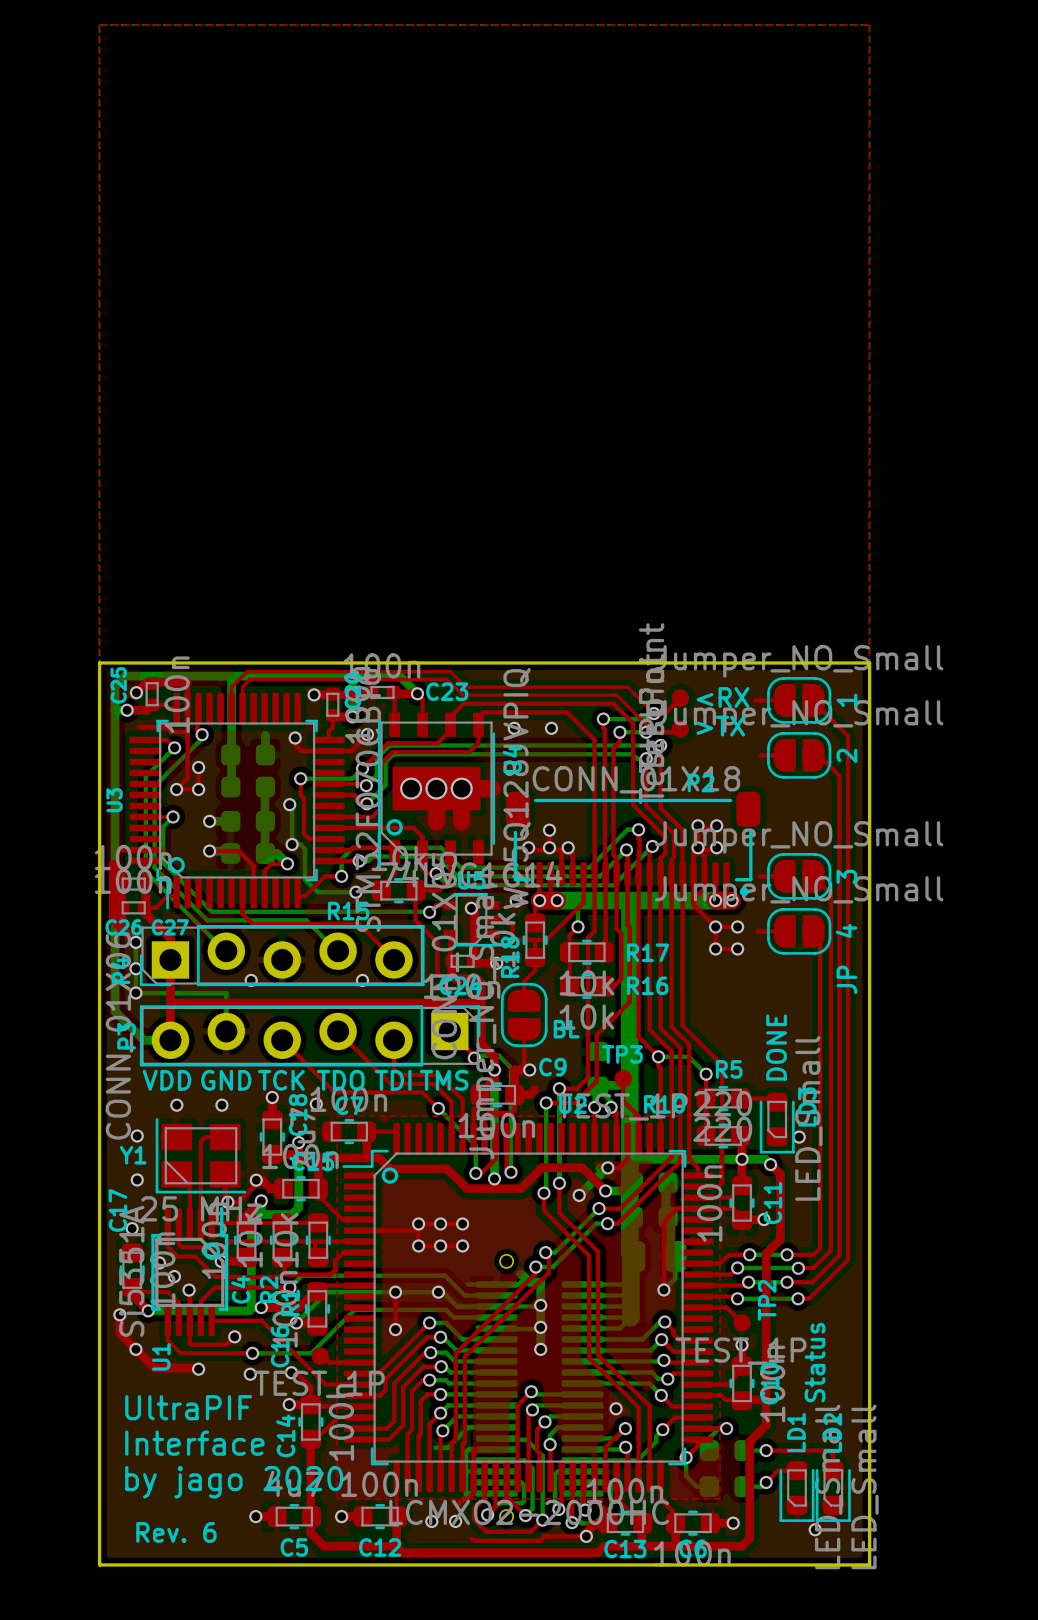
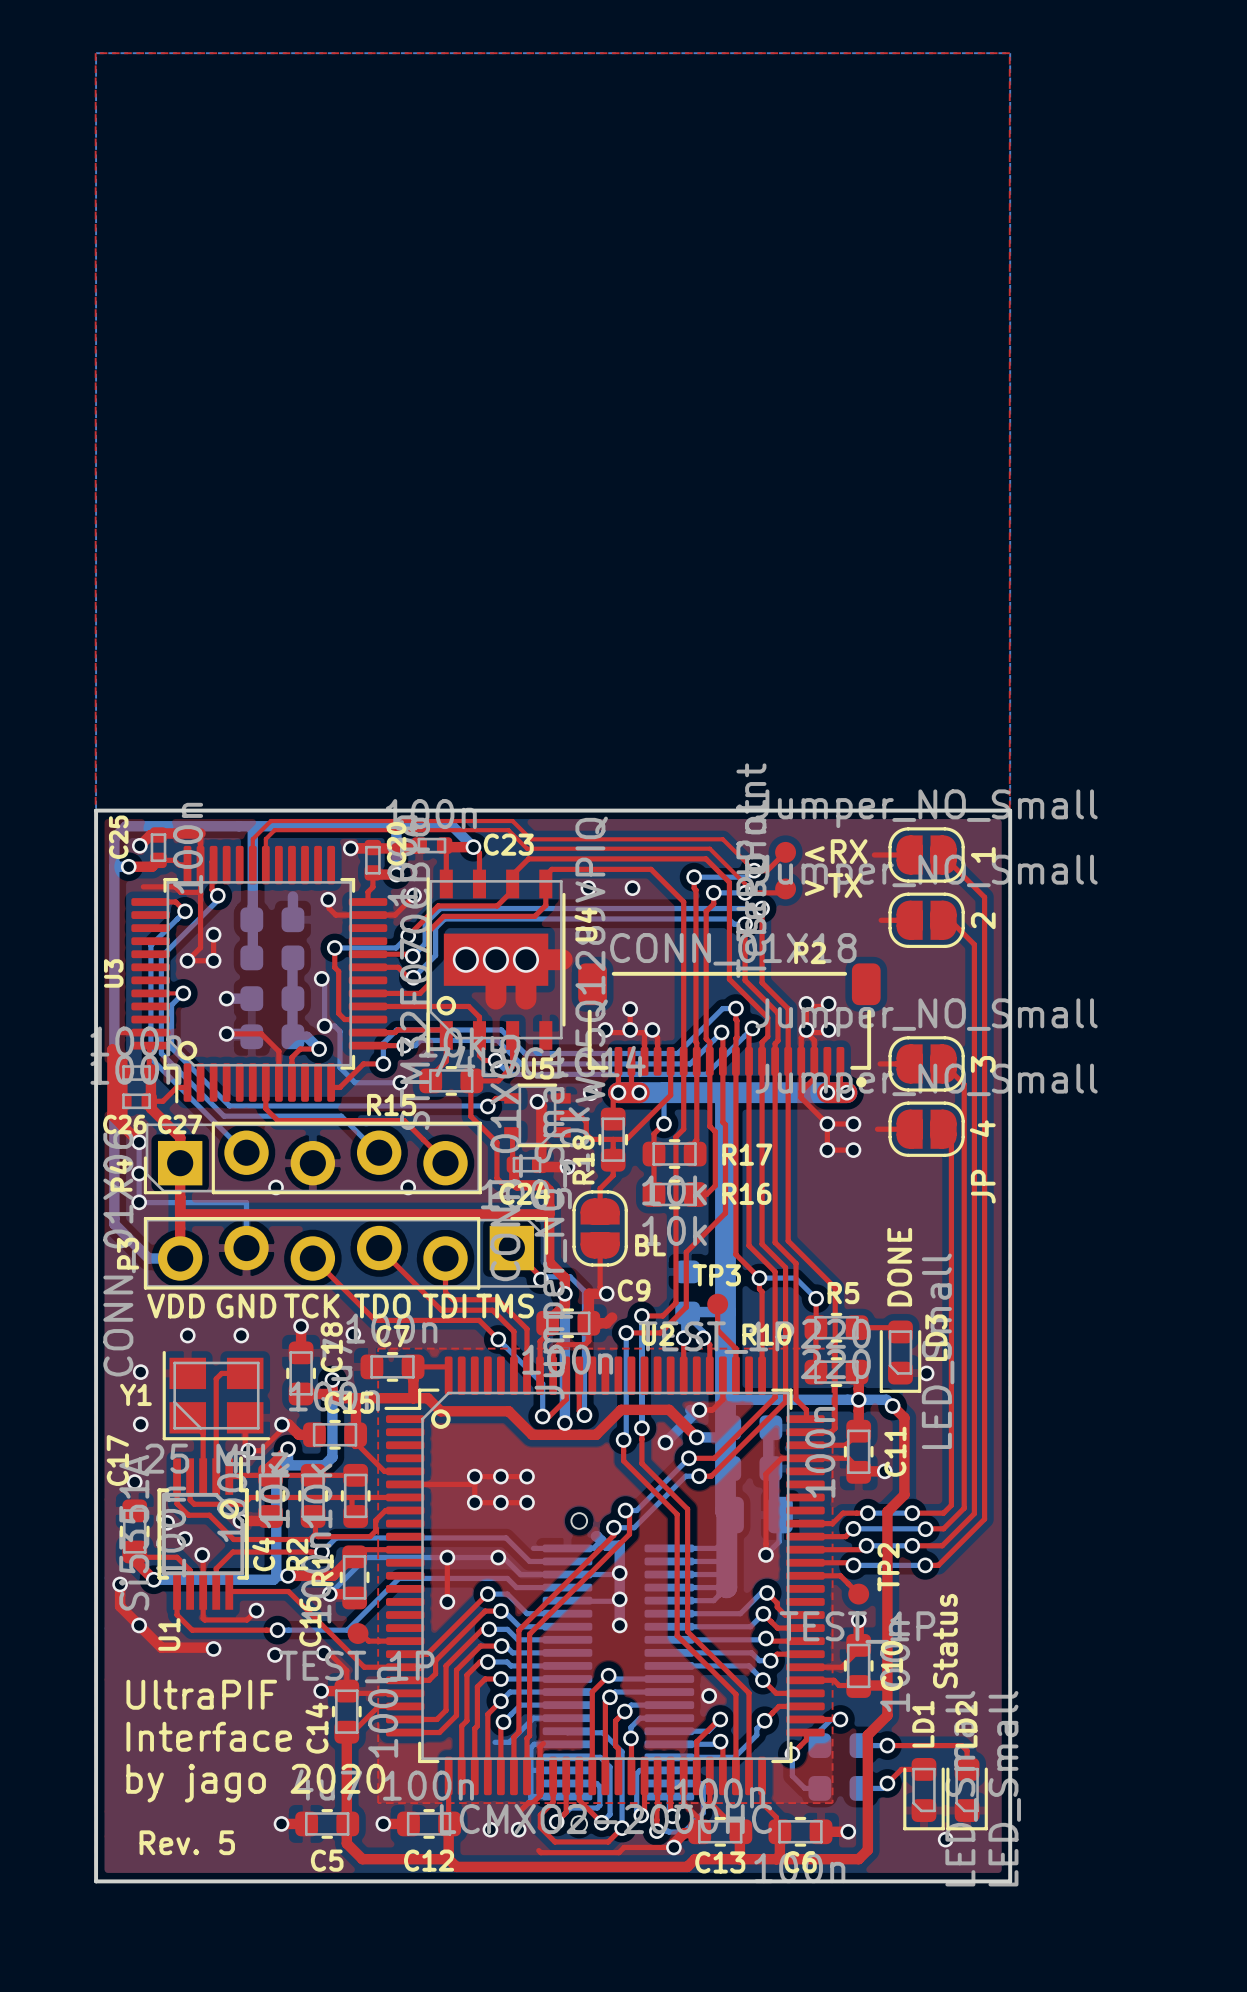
text: Rev. 6 (176, 1532) -> Rev. 5 (187, 1842)

